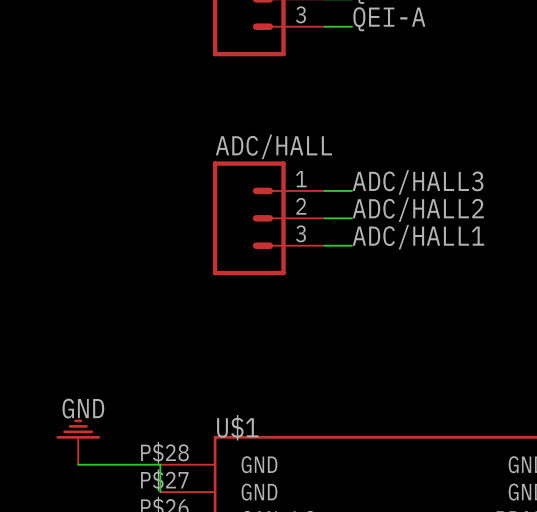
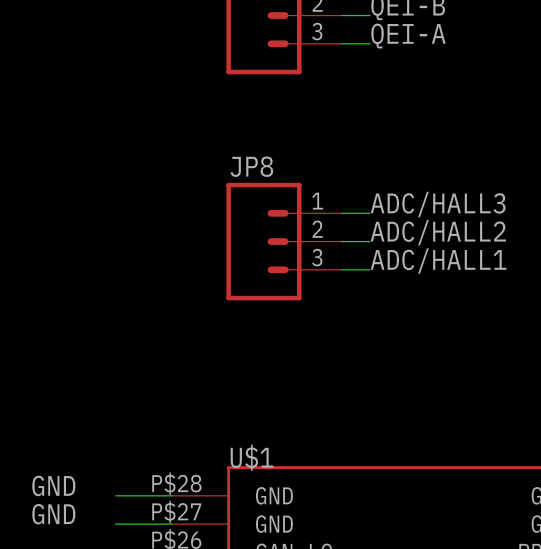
ADC/HALL name: ADC/HALL (273, 146) -> JP8 (251, 166)
power symbol: GND (78, 442) -> none
label: none -> GND (53, 485)
wire: (78, 464) (105, 464) -> none
wire: (160, 464) (160, 492) -> (115, 524) (172, 524)
label: none -> GND (53, 514)

